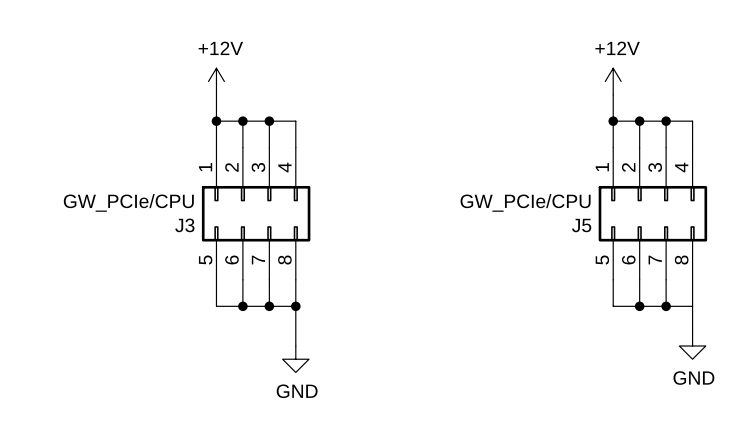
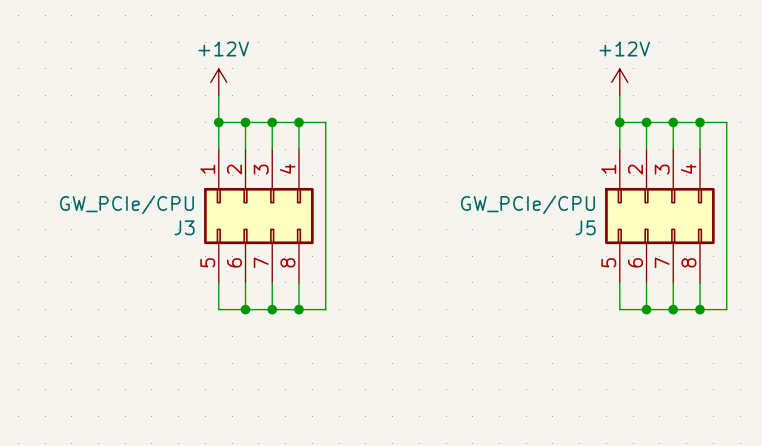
junction: none -> (298, 122)
junction: none -> (699, 122)
wire: (295, 306) (295, 346) -> (298, 309) (325, 309) (325, 122) (298, 122)
wire: (692, 306) (692, 332) -> (699, 309) (726, 309) (726, 122) (699, 122)
junction: none -> (699, 309)
power symbol: GND (692, 346) -> none
power symbol: GND (295, 359) -> none

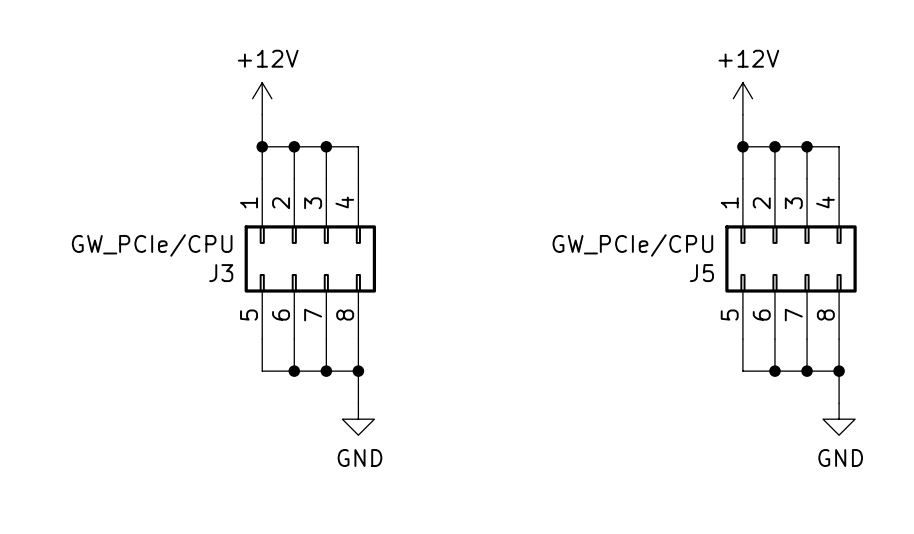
wire: (298, 122) (325, 122) (325, 309) (298, 309) -> (358, 403) (358, 371)
junction: (298, 122) -> none
wire: (699, 122) (726, 122) (726, 309) (699, 309) -> (839, 403) (839, 371)
junction: (699, 122) -> none
power symbol: none -> GND (358, 419)
power symbol: none -> GND (839, 419)

